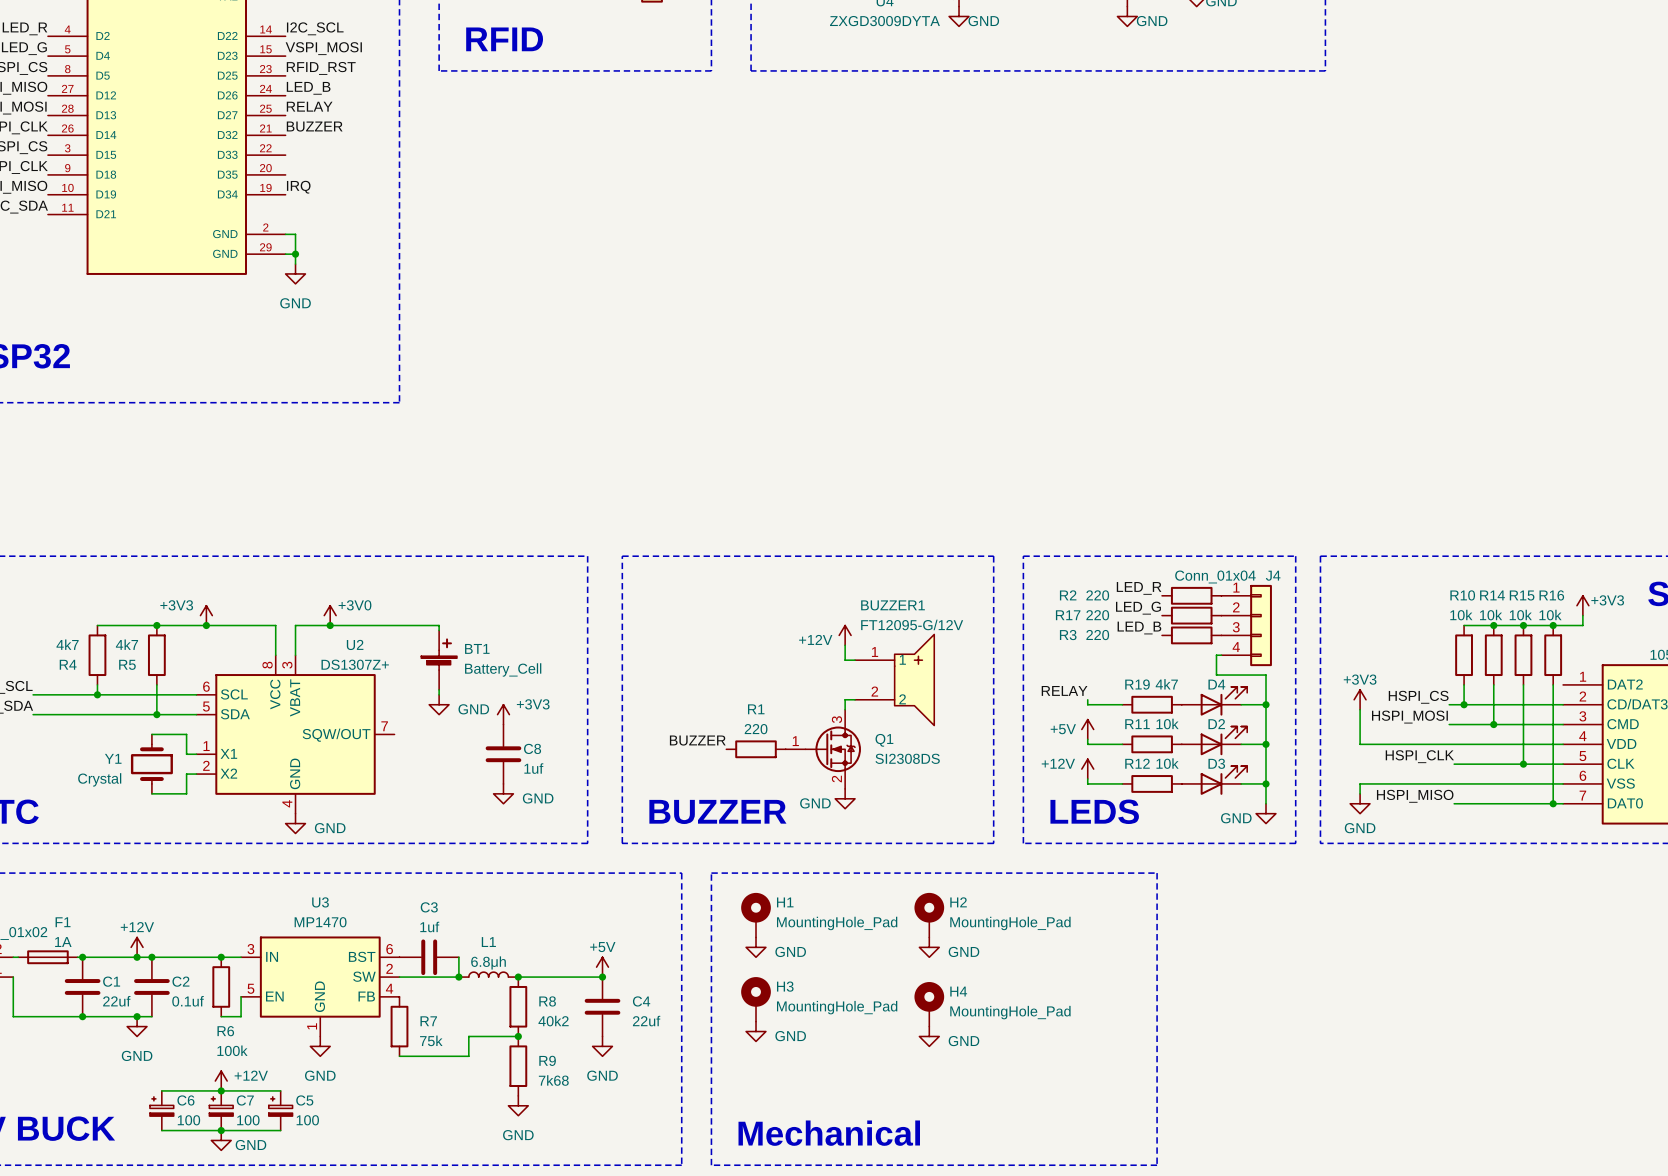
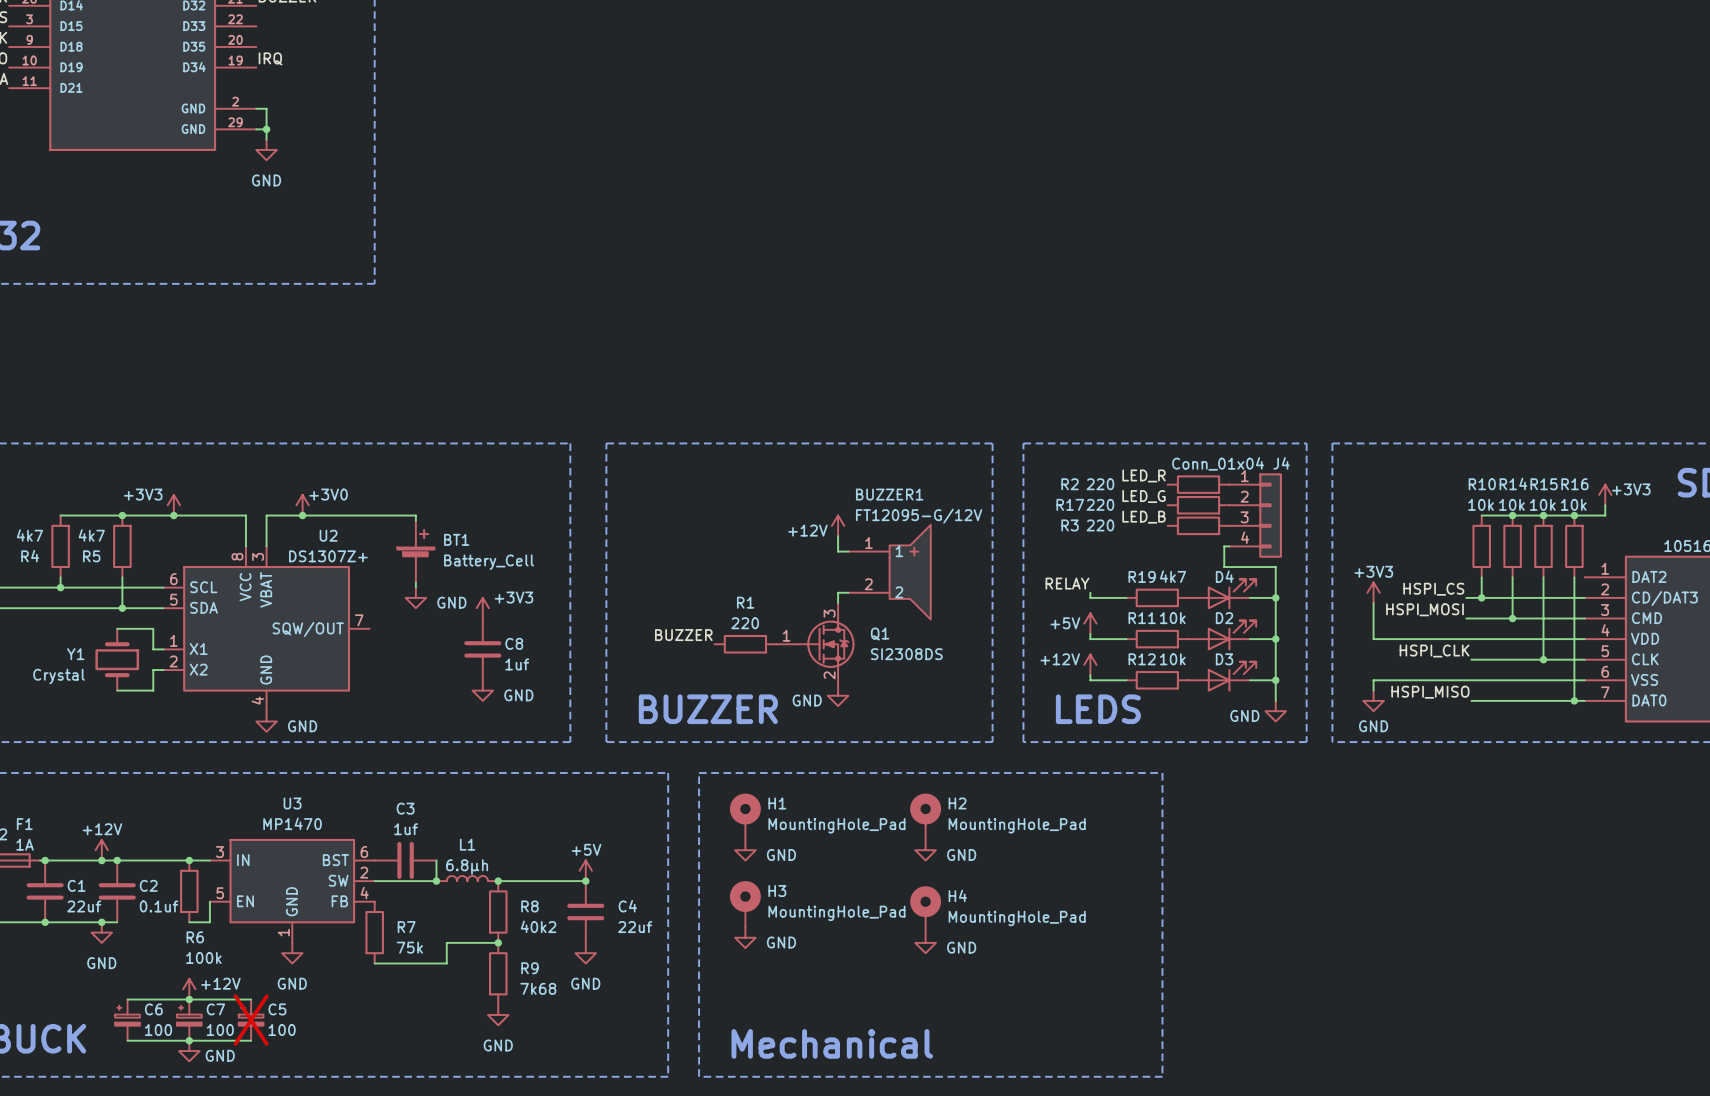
C5 do-not-place cross: none -> (251, 1020)

